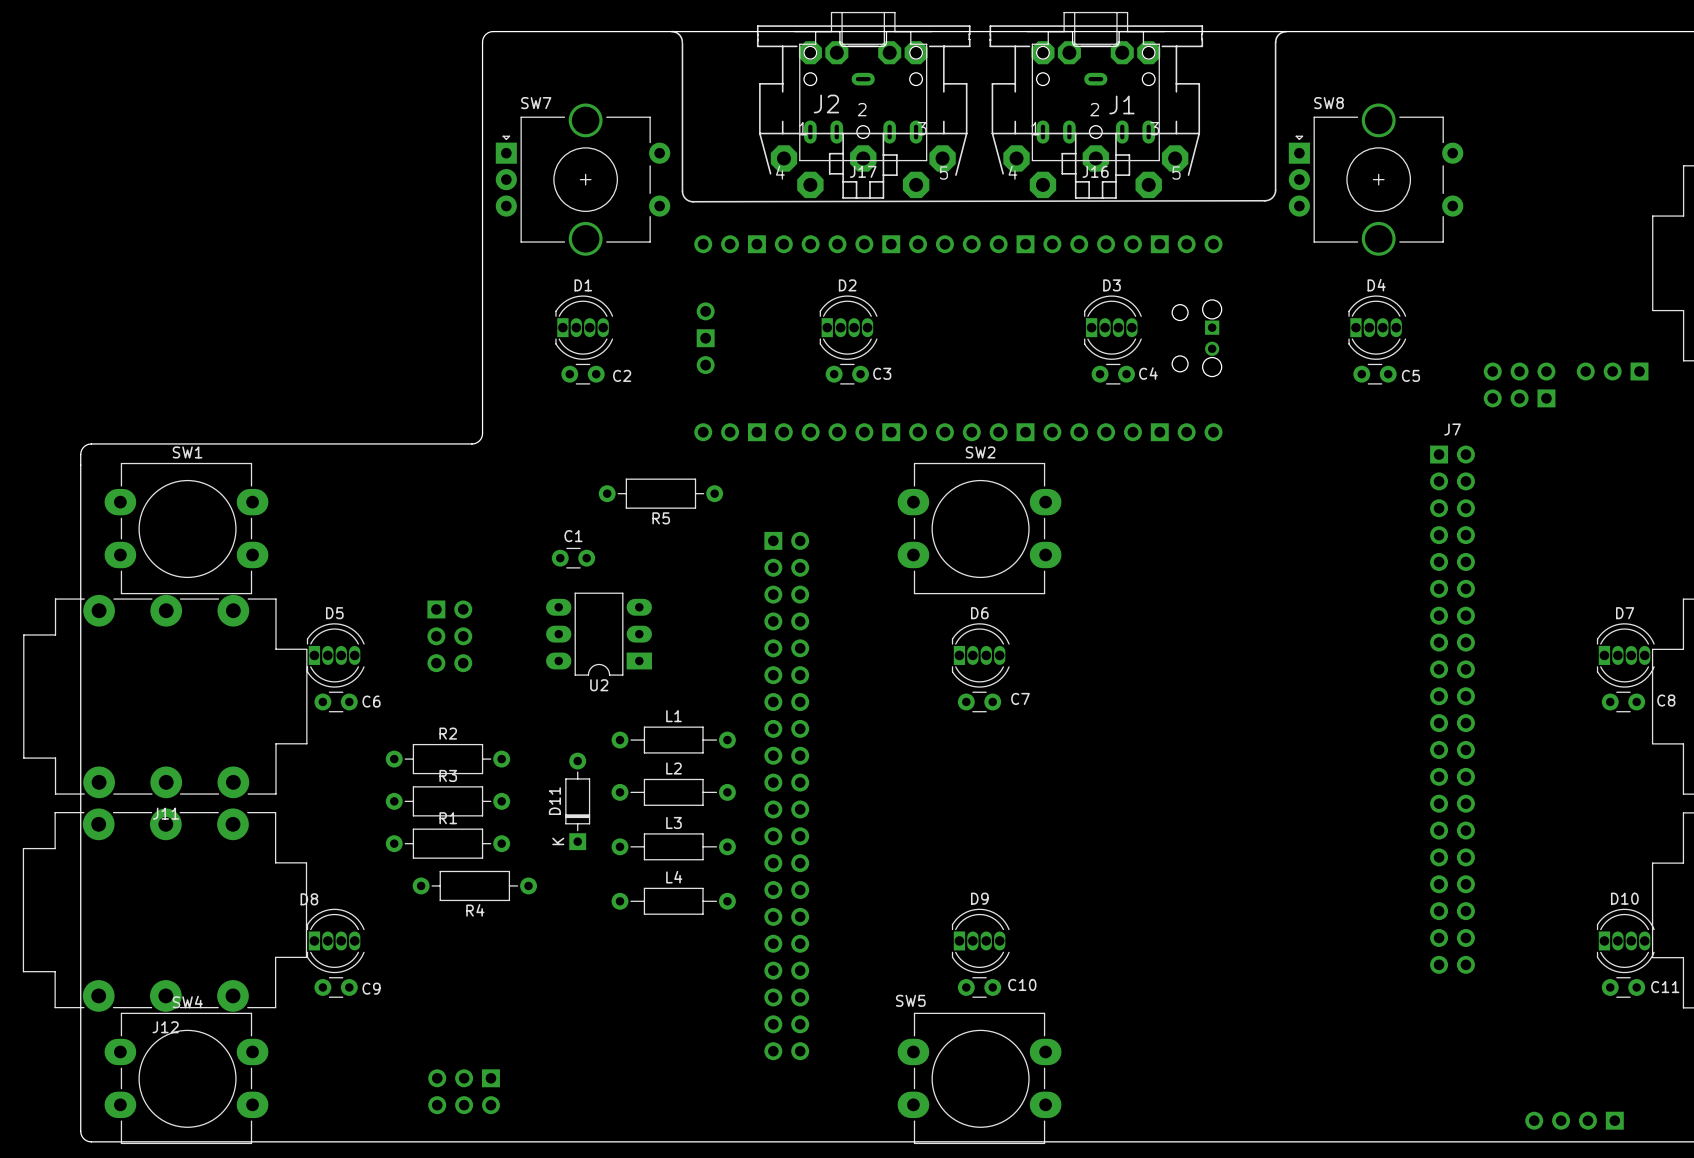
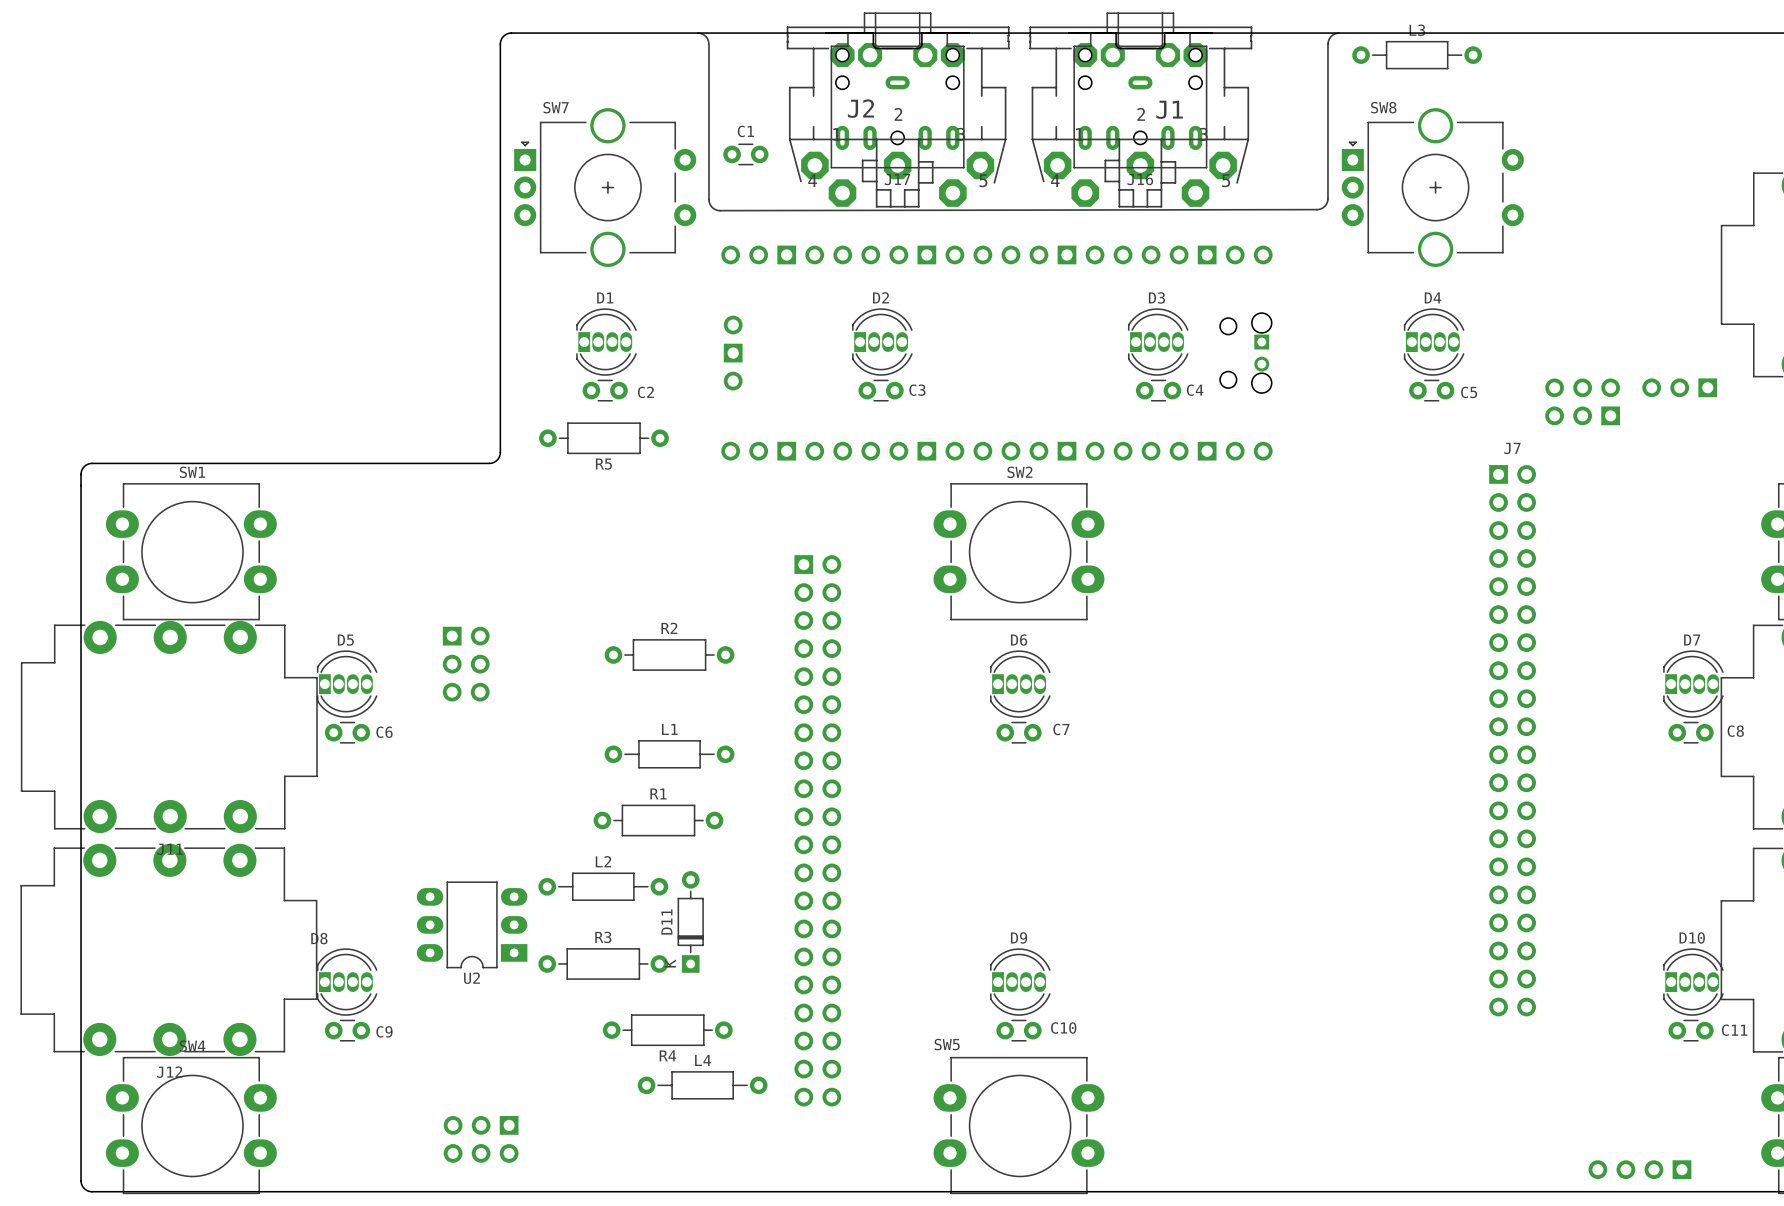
R5 position: (660, 493) -> (603, 438)
C1 position: (573, 558) -> (745, 154)
U2 position: (599, 634) -> (472, 924)
L1 position: (673, 740) -> (669, 754)
R2 position: (447, 759) -> (669, 654)
L2 position: (673, 792) -> (603, 886)
R3 position: (447, 801) -> (603, 963)
D11 position: (577, 801) -> (690, 921)
R1 position: (447, 843) -> (658, 820)
L3 position: (673, 846) -> (1417, 55)
R4 position: (474, 885) -> (667, 1030)
L4 position: (673, 901) -> (702, 1085)

